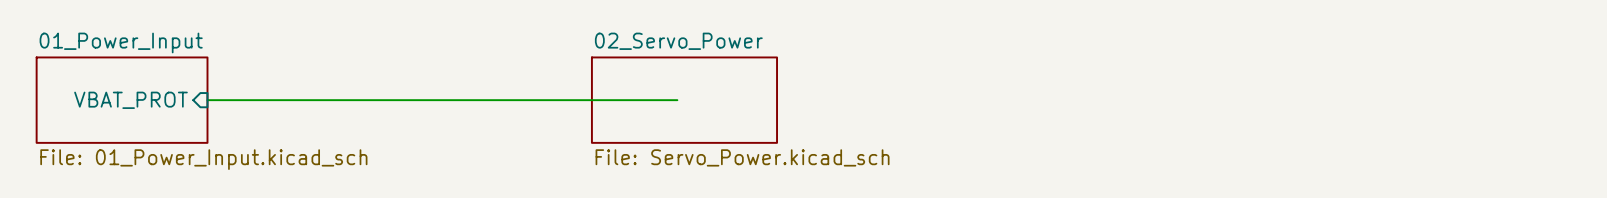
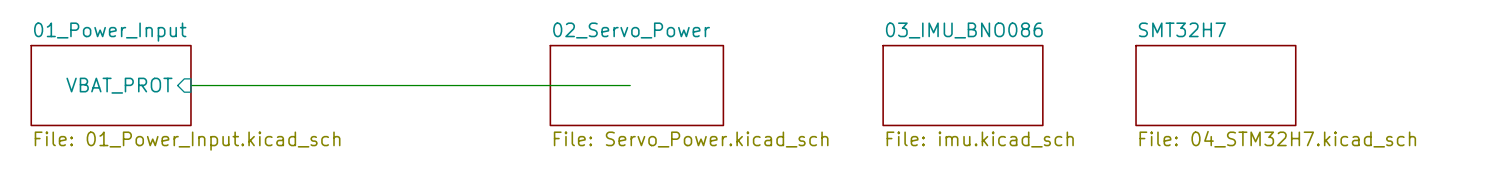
sheet 03_IMU_BNO086: none -> File: imu.kicad_sch (962, 85)
sheet SMT32H7: none -> File: 04_STM32H7.kicad_sch (1215, 85)

